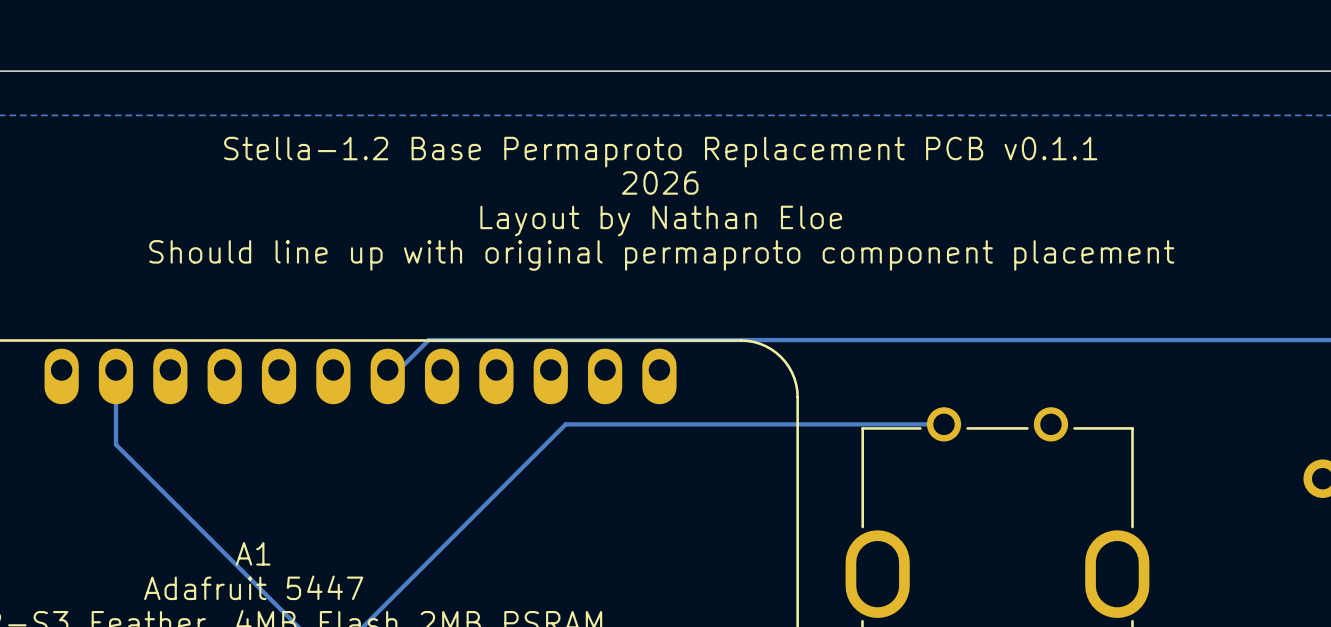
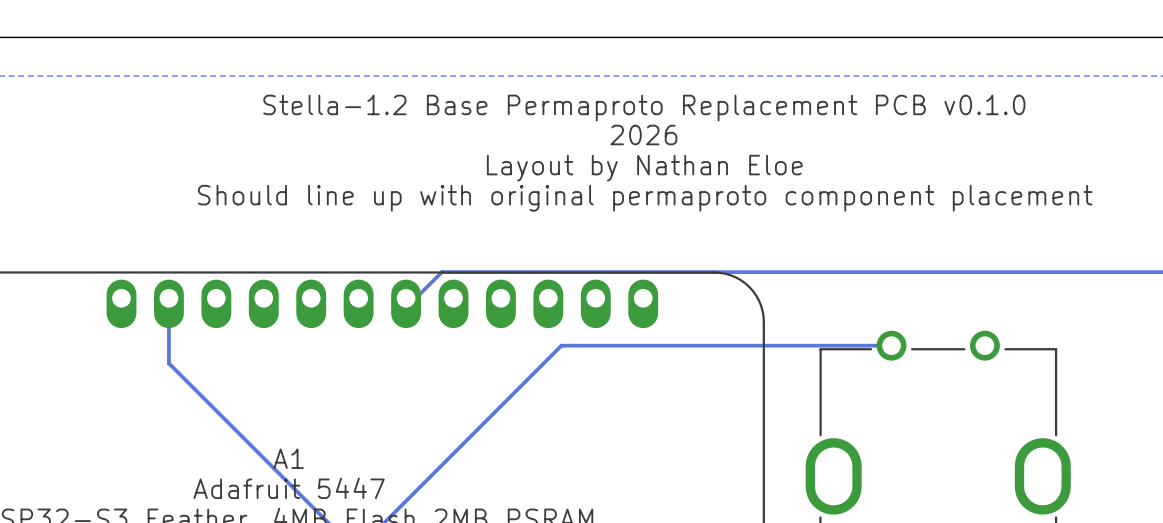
text: Stella-1.2 Base Permaproto Replacement PCB v0.1.1 (660, 152) -> Stella-1.2 Base Permaproto Replacement PCB v0.1.0 (644, 108)

